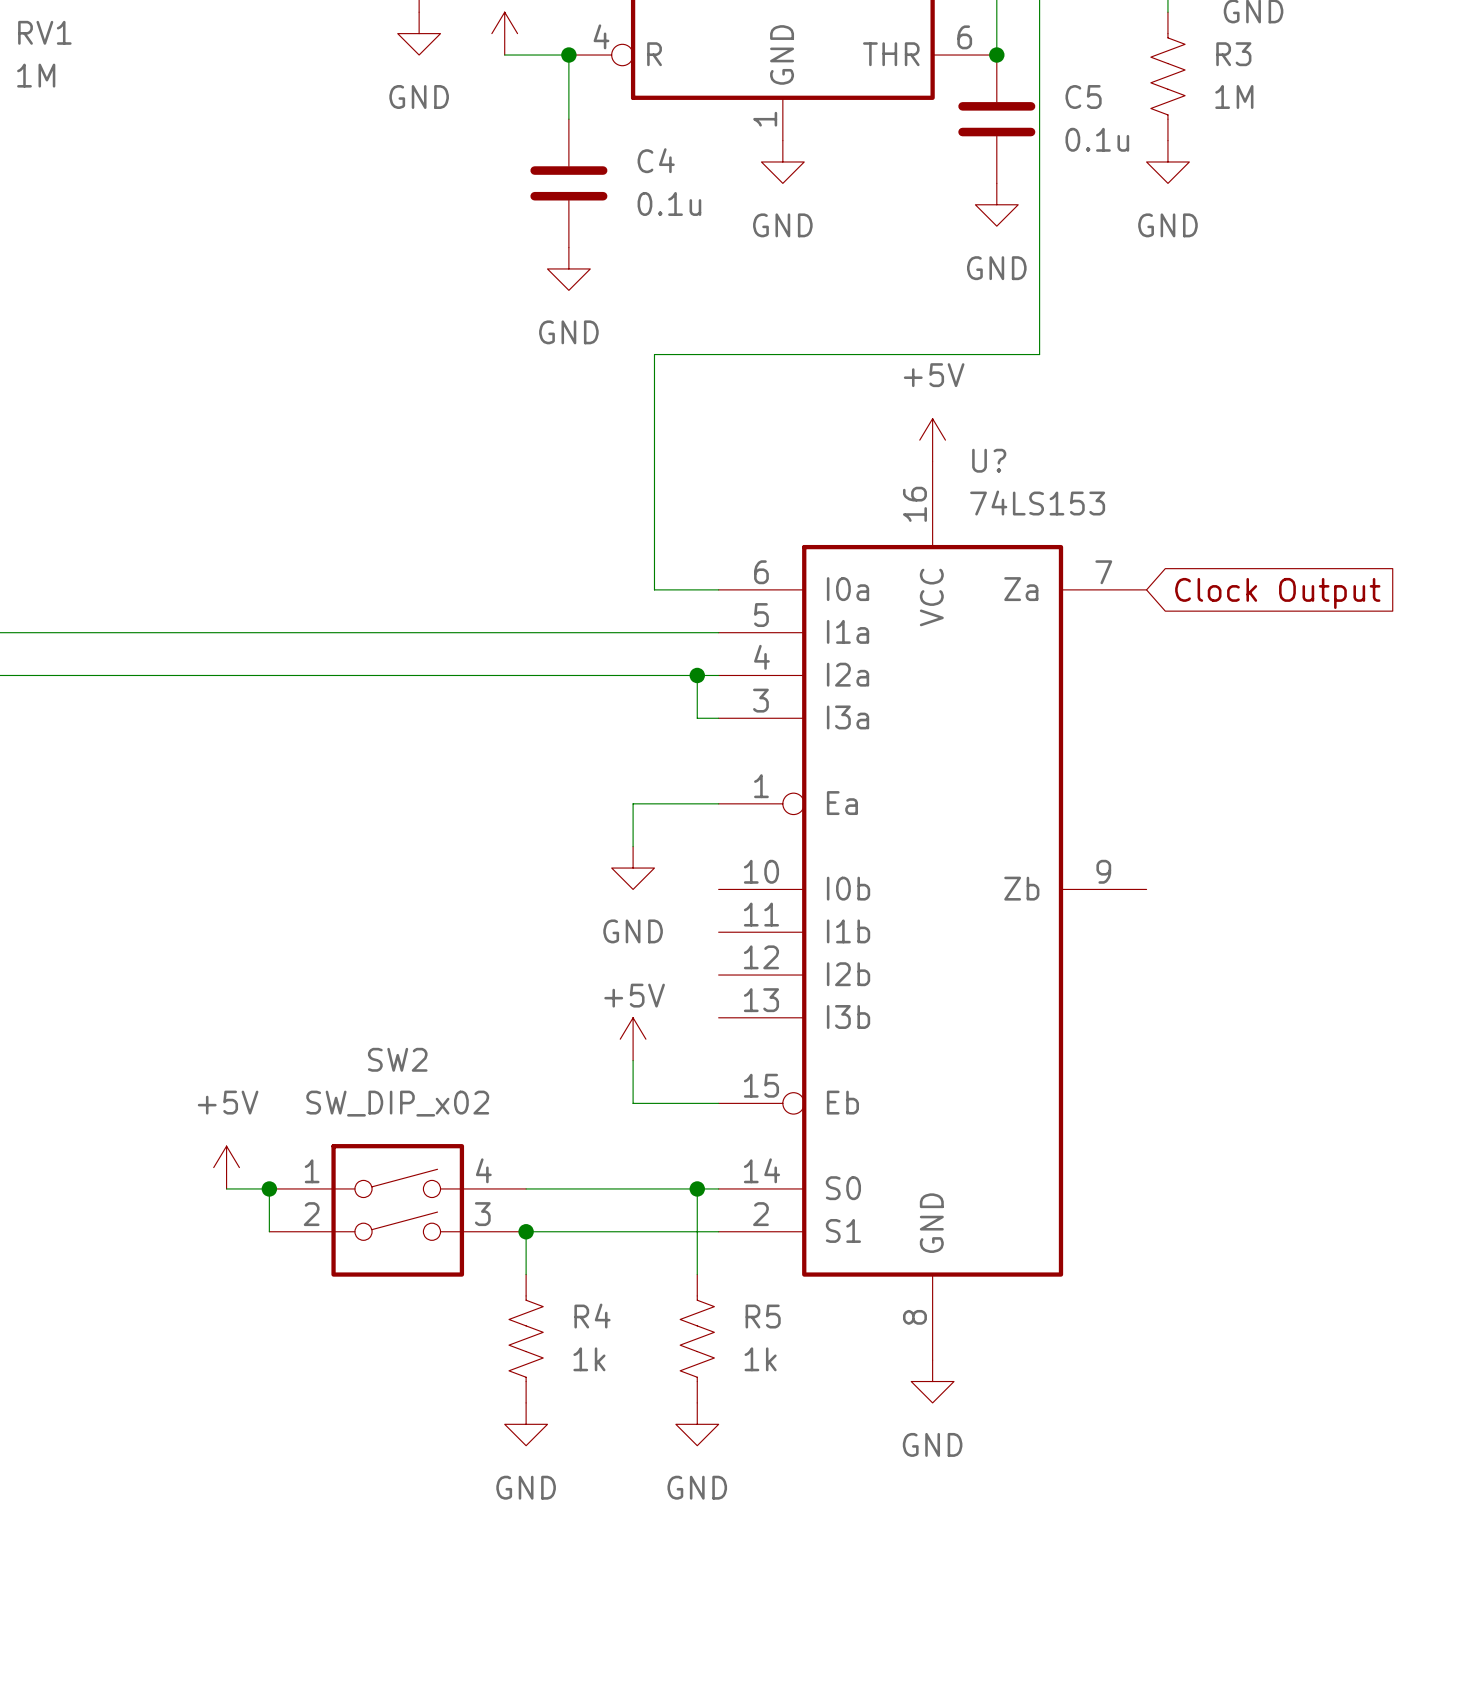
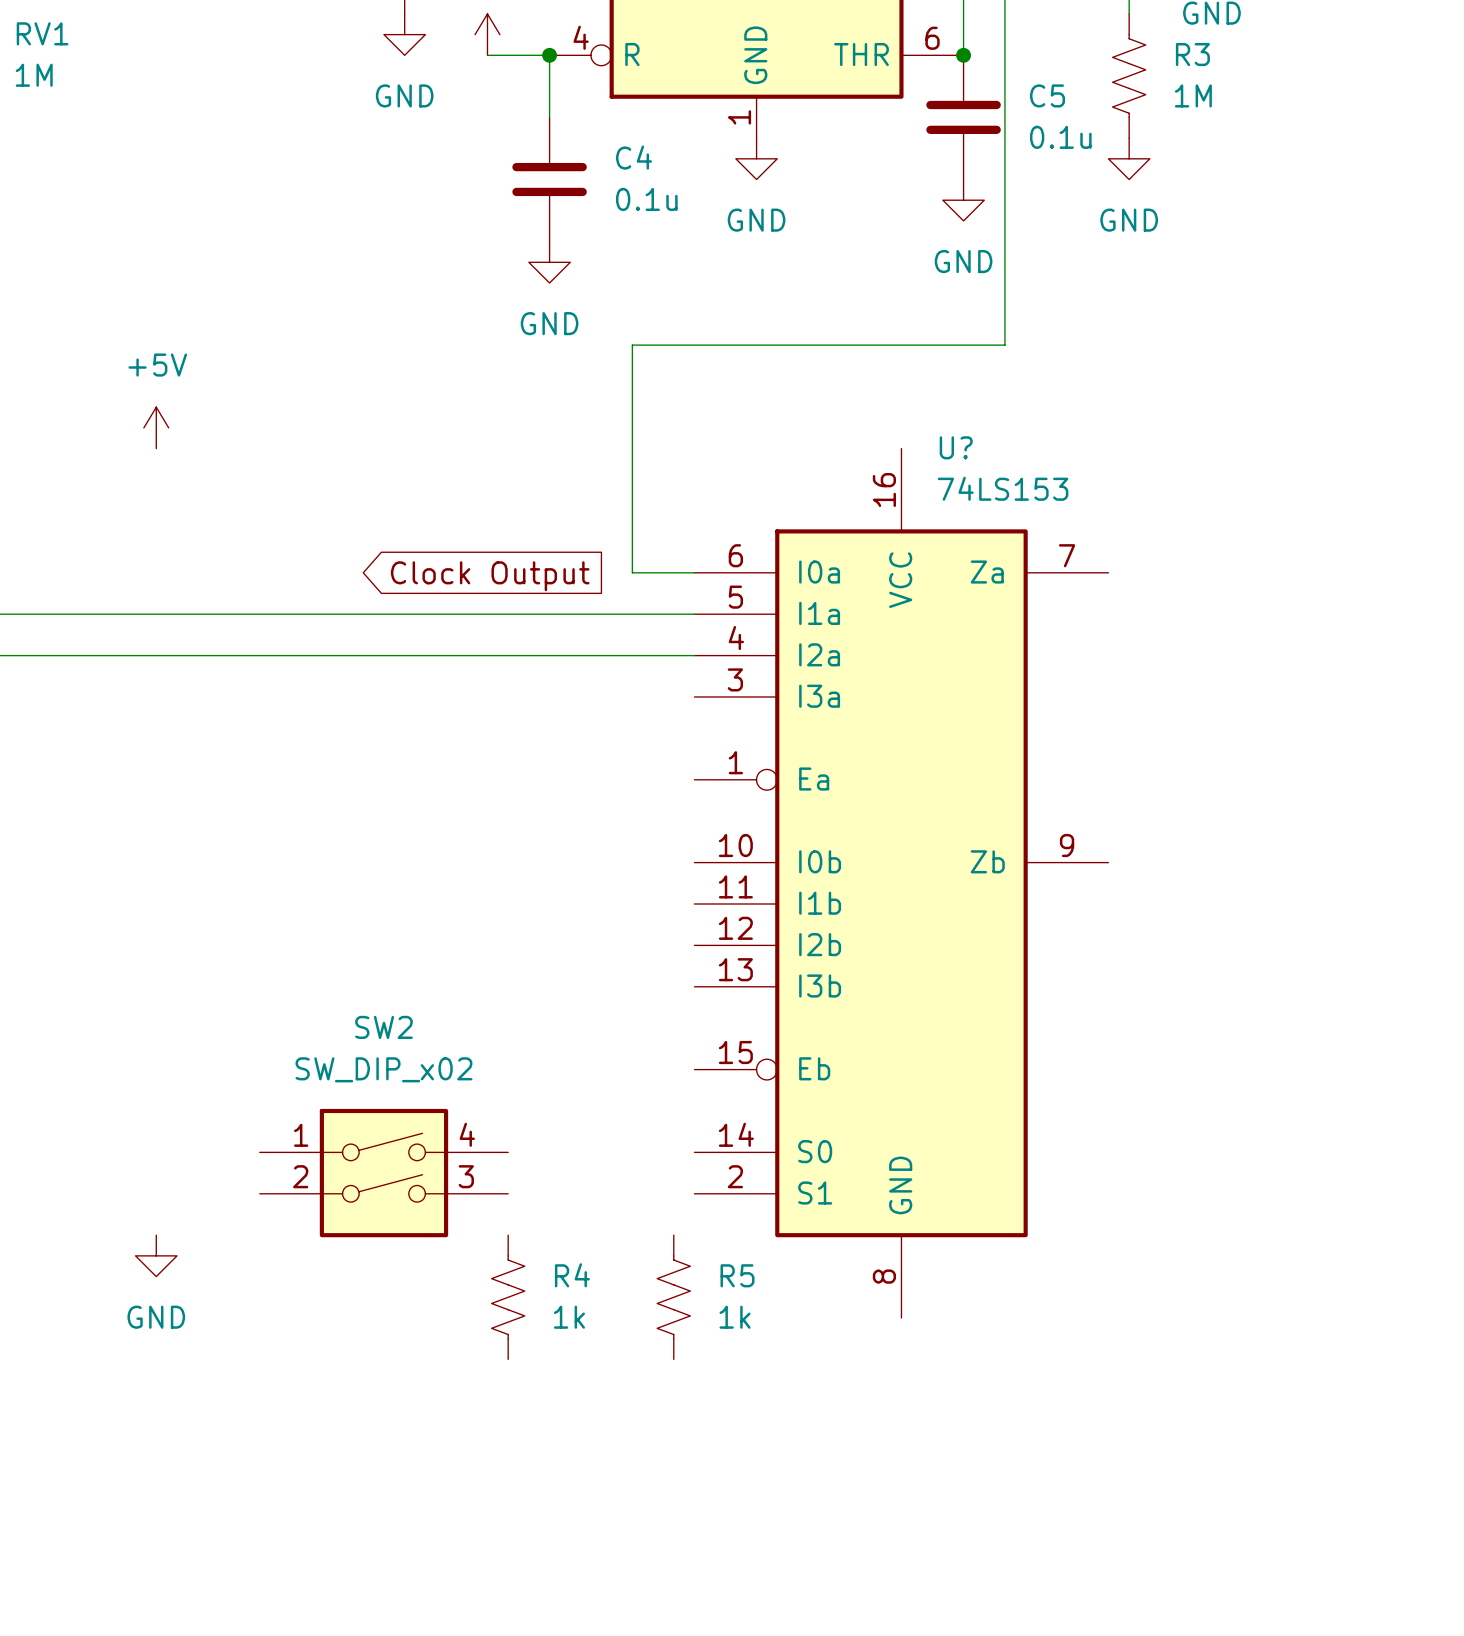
power symbol: none -> +5V (156, 427)
power symbol: +5V (932, 440) -> none
global label: none -> Clock Output (490, 576)
global label: Clock Output (1277, 593) -> none
wire: (697, 675) (697, 718) (718, 718) -> none
junction: (697, 675) -> none
wire: (718, 803) (633, 803) (633, 846) -> none
power symbol: GND (633, 868) -> none
power symbol: +5V (633, 1039) -> none
wire: (633, 1060) (633, 1103) (718, 1103) -> none
power symbol: +5V (226, 1167) -> none
wire: (226, 1188) (269, 1188) (269, 1231) -> none
junction: (269, 1188) -> none
wire: (526, 1188) (718, 1188) -> none
wire: (697, 1188) (697, 1274) -> none
junction: (697, 1188) -> none
junction: (526, 1231) -> none
wire: (718, 1231) (526, 1231) (526, 1274) -> none
power symbol: none -> GND (156, 1255)
power symbol: GND (932, 1381) -> none
power symbol: GND (526, 1424) -> none
power symbol: GND (697, 1424) -> none

